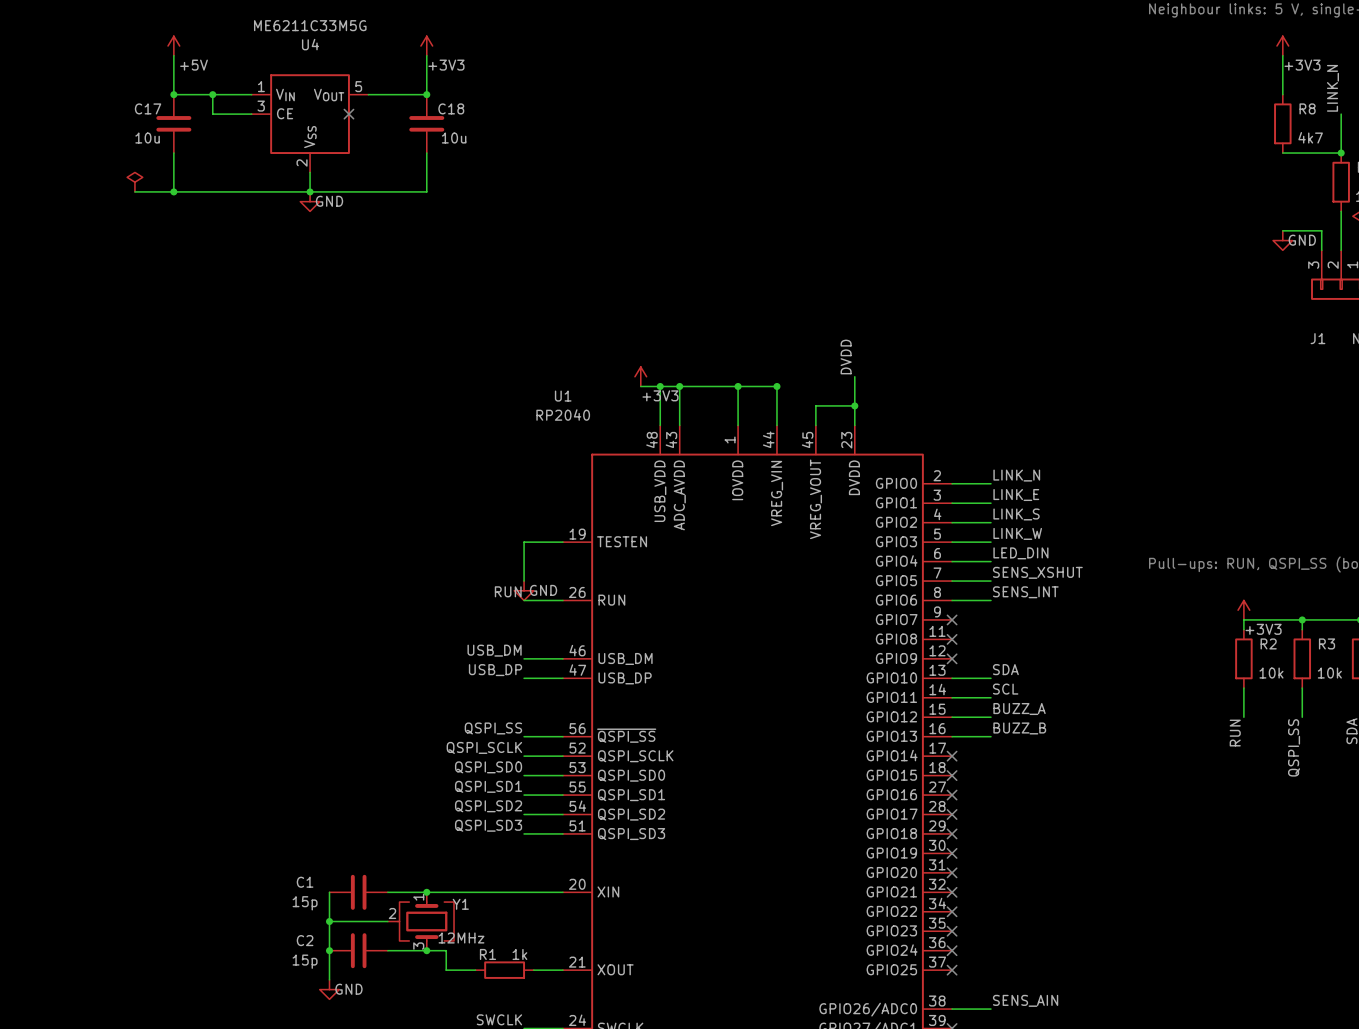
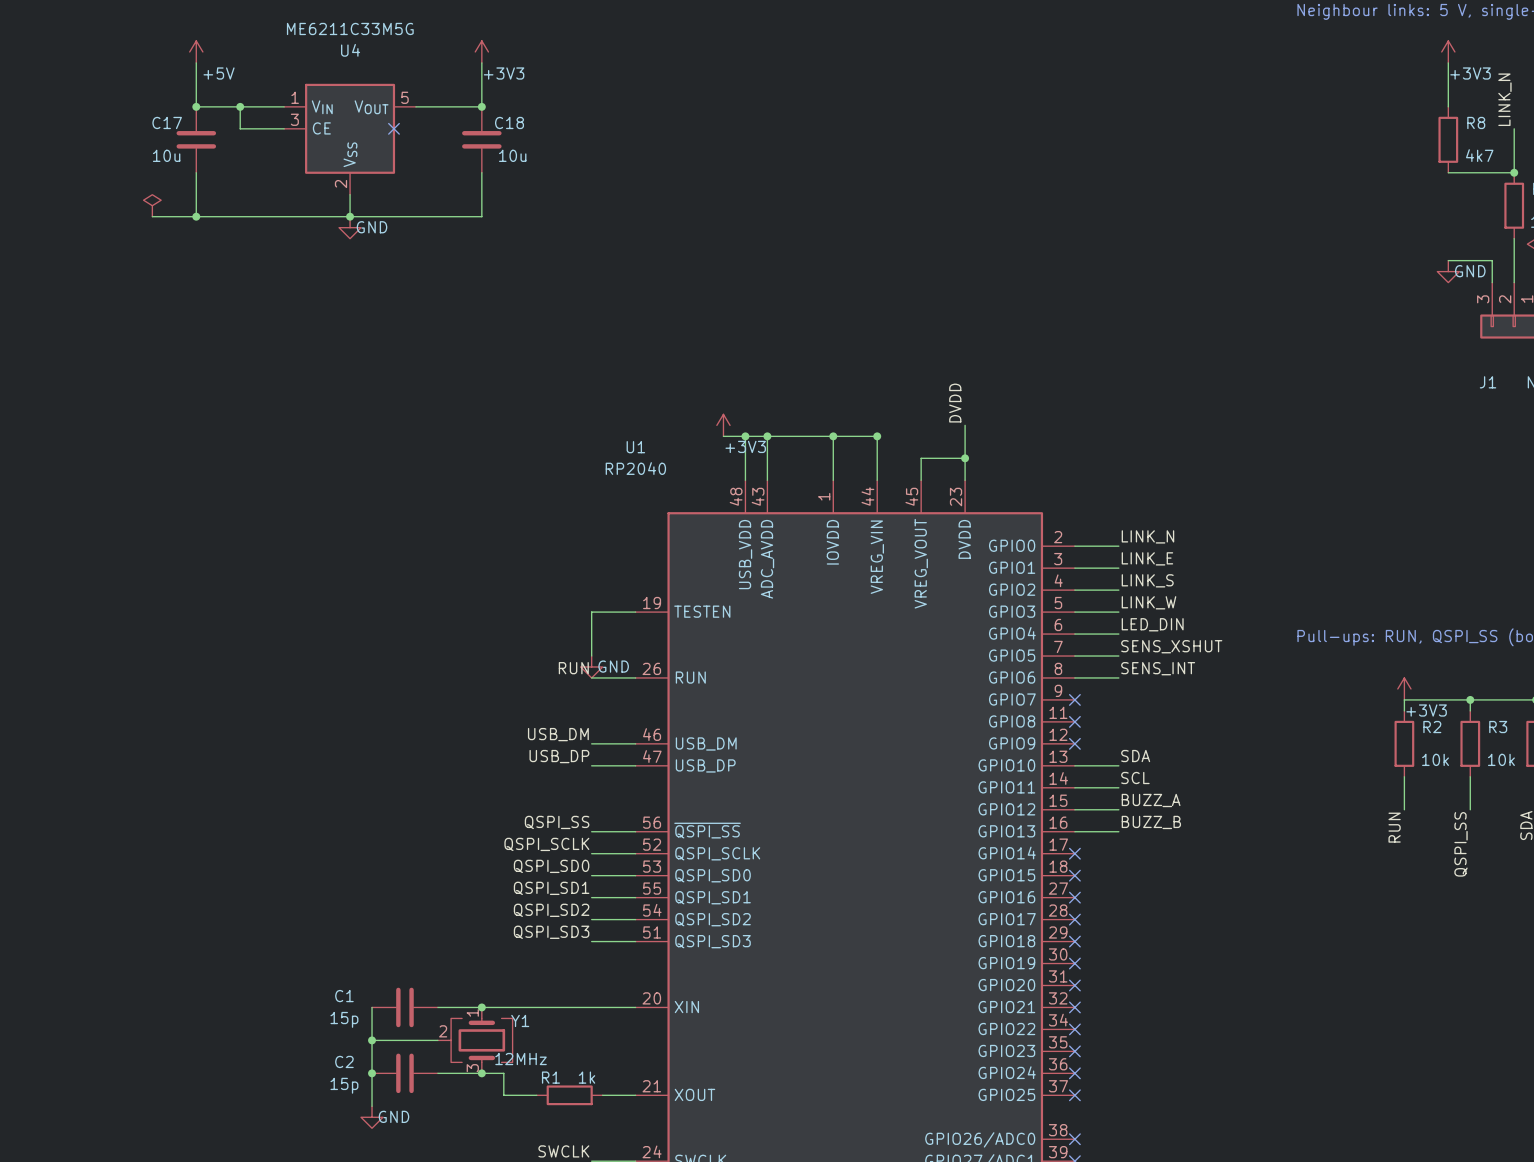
label: SENS_AIN (1025, 1000) -> none
wire: (952, 1009) (990, 1009) -> none
no-connect mark: none -> (1074, 1139)

